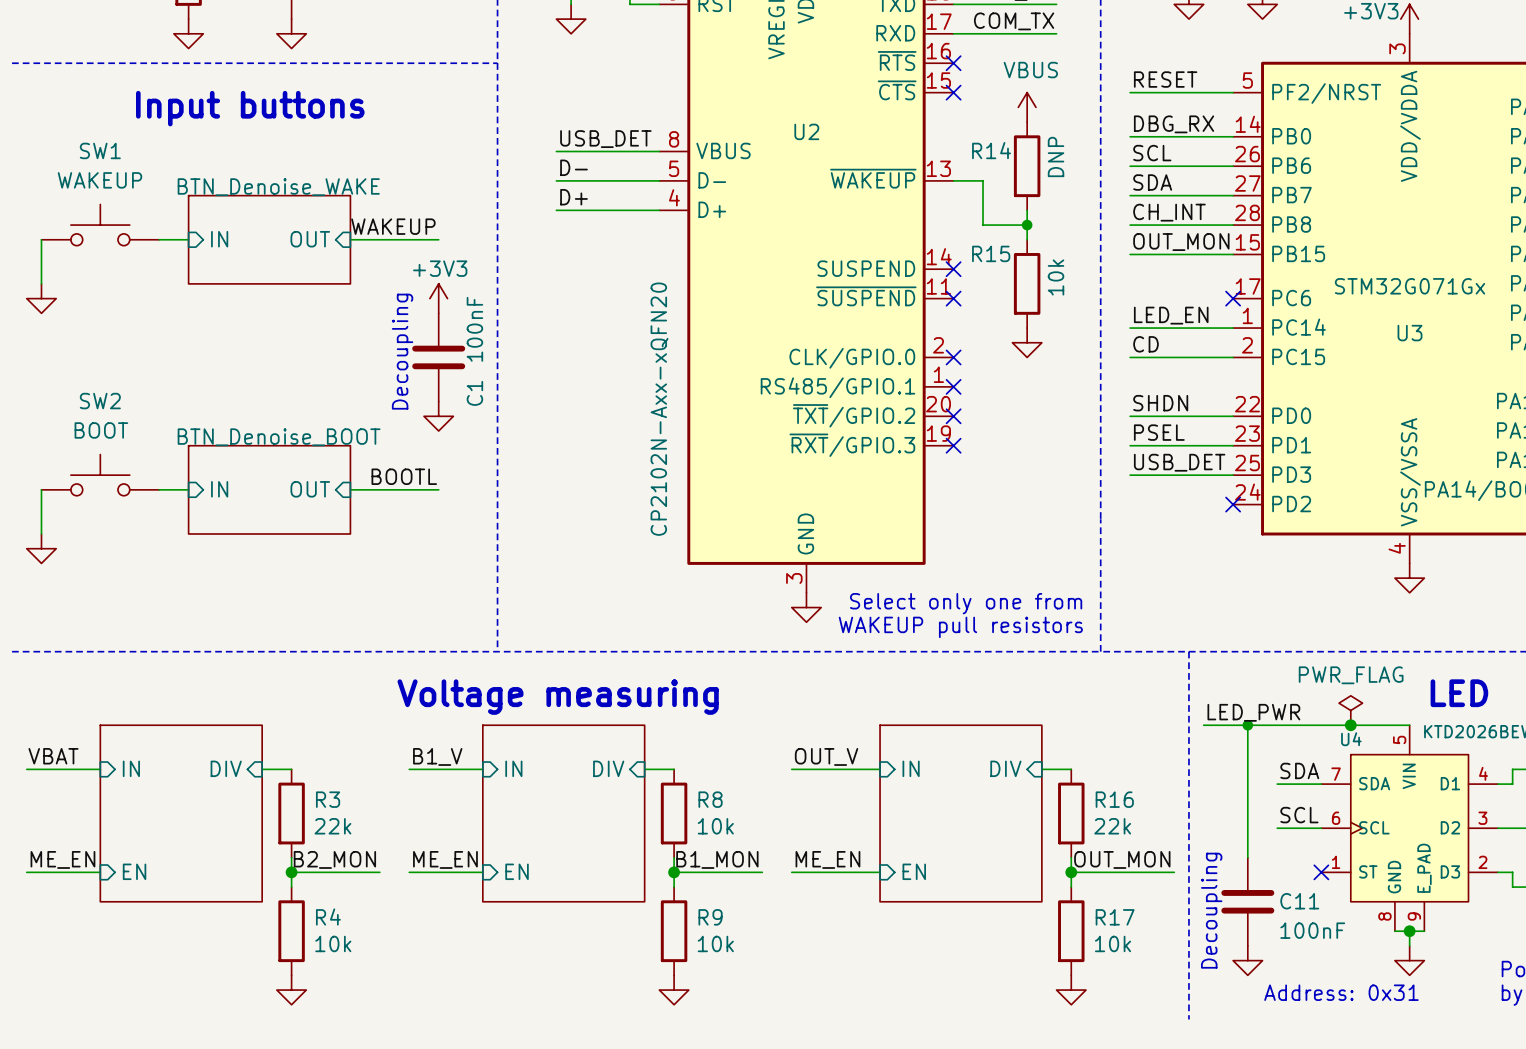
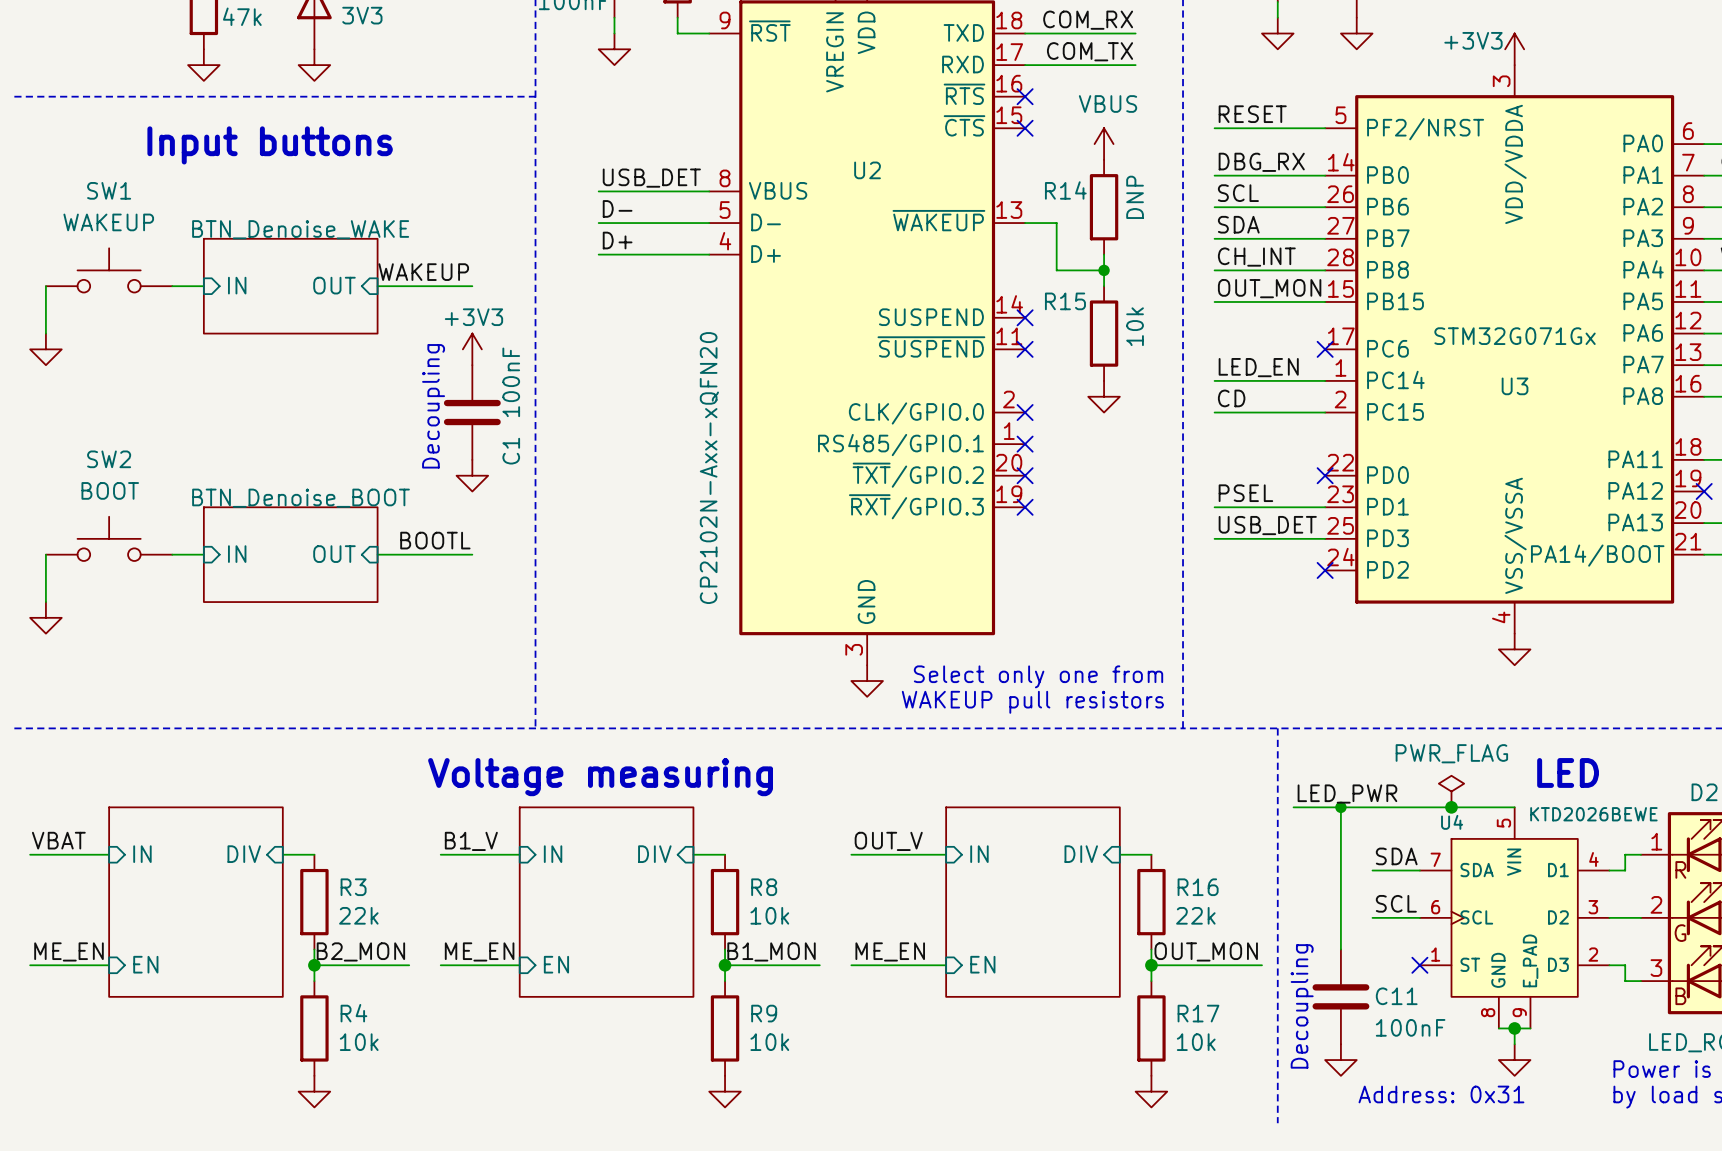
label: SHDN (1160, 403) -> none
wire: (1130, 416) (1233, 416) -> none
no-connect mark: none -> (1325, 475)

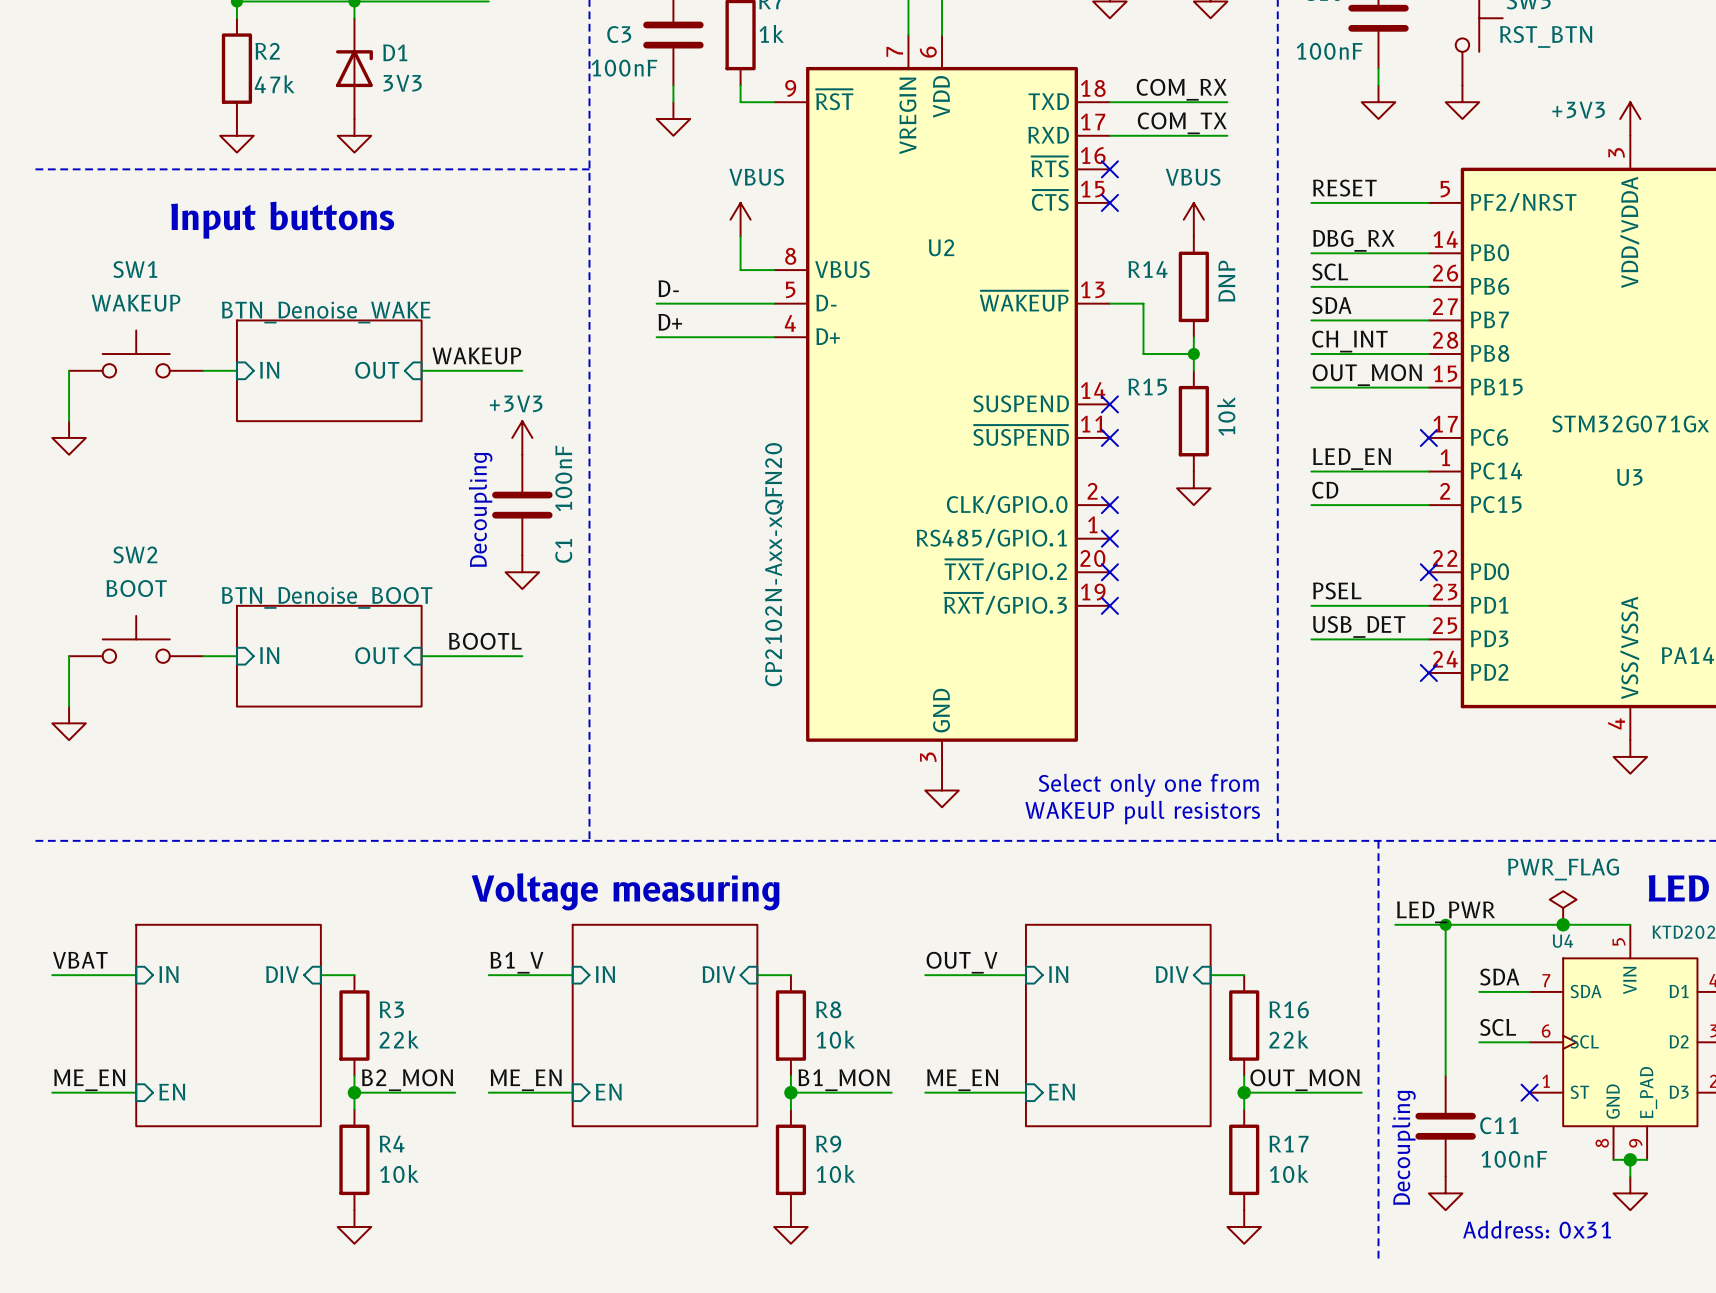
power symbol: none -> VBUS (740, 219)
label: USB_DET (651, 178) -> none
wire: (598, 191) (677, 191) -> (740, 236) (740, 270)

